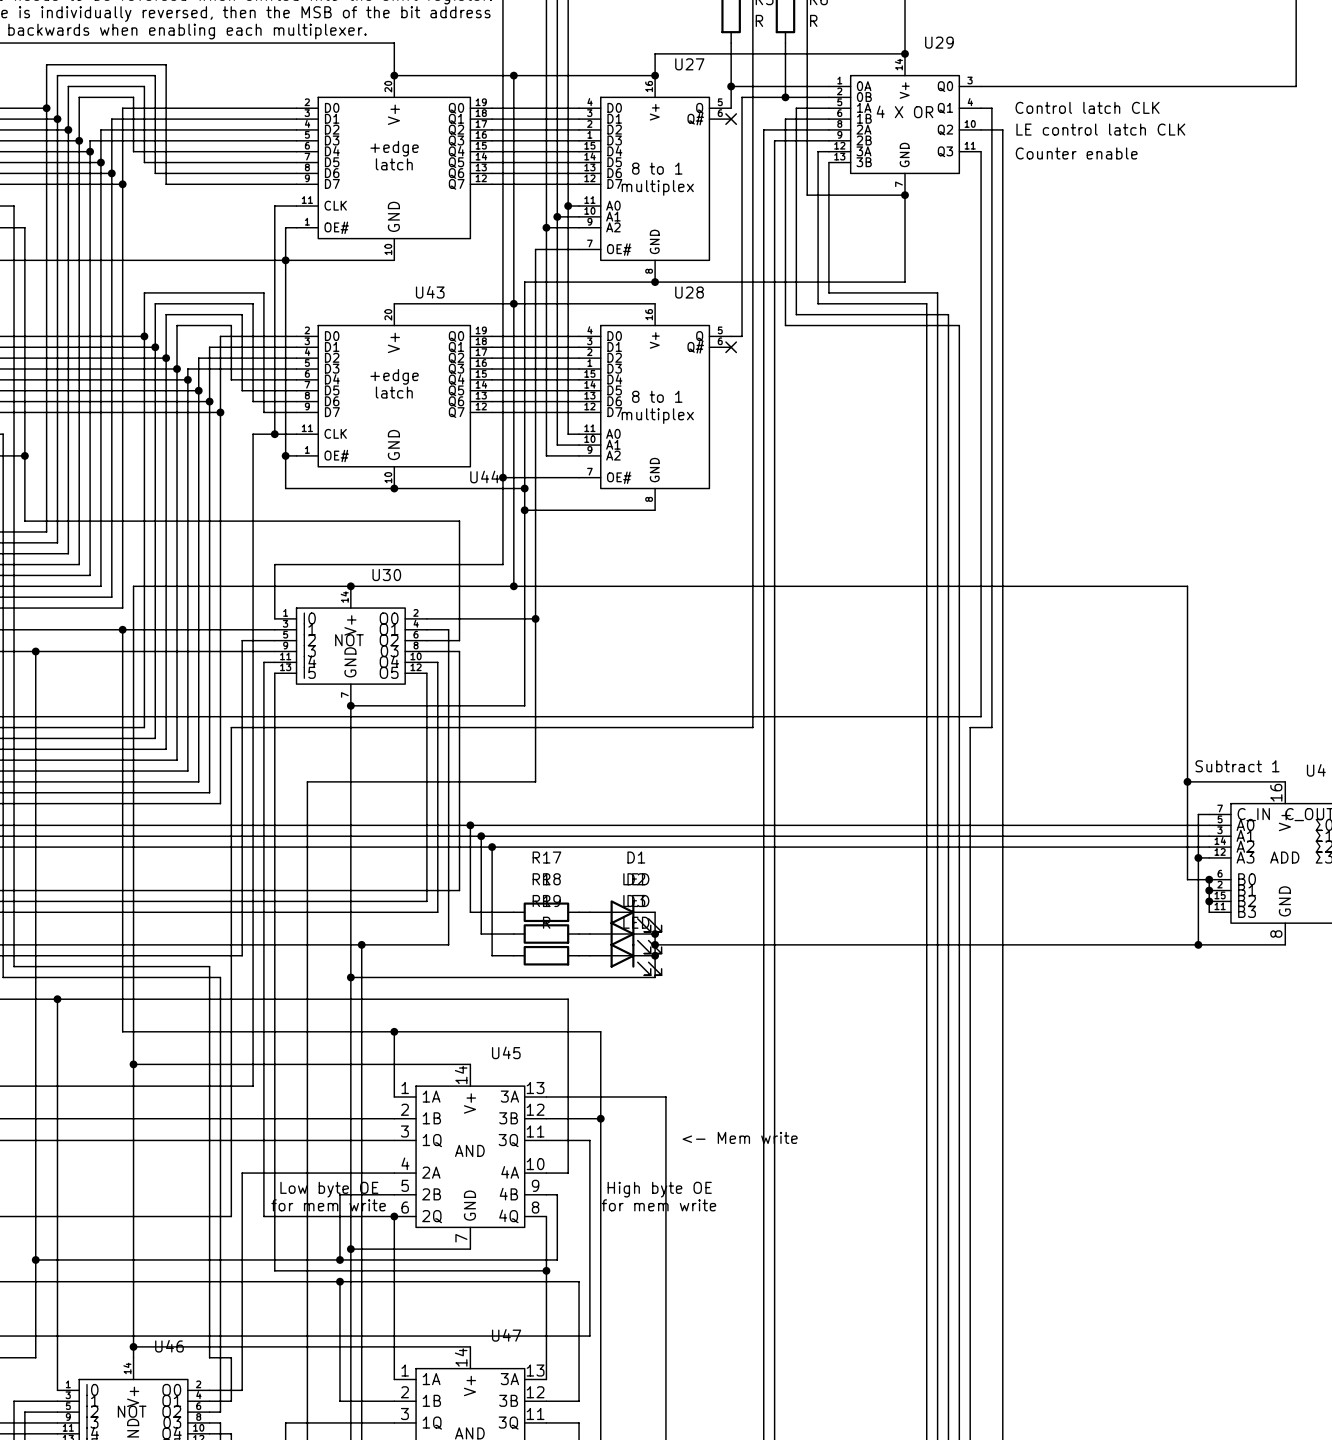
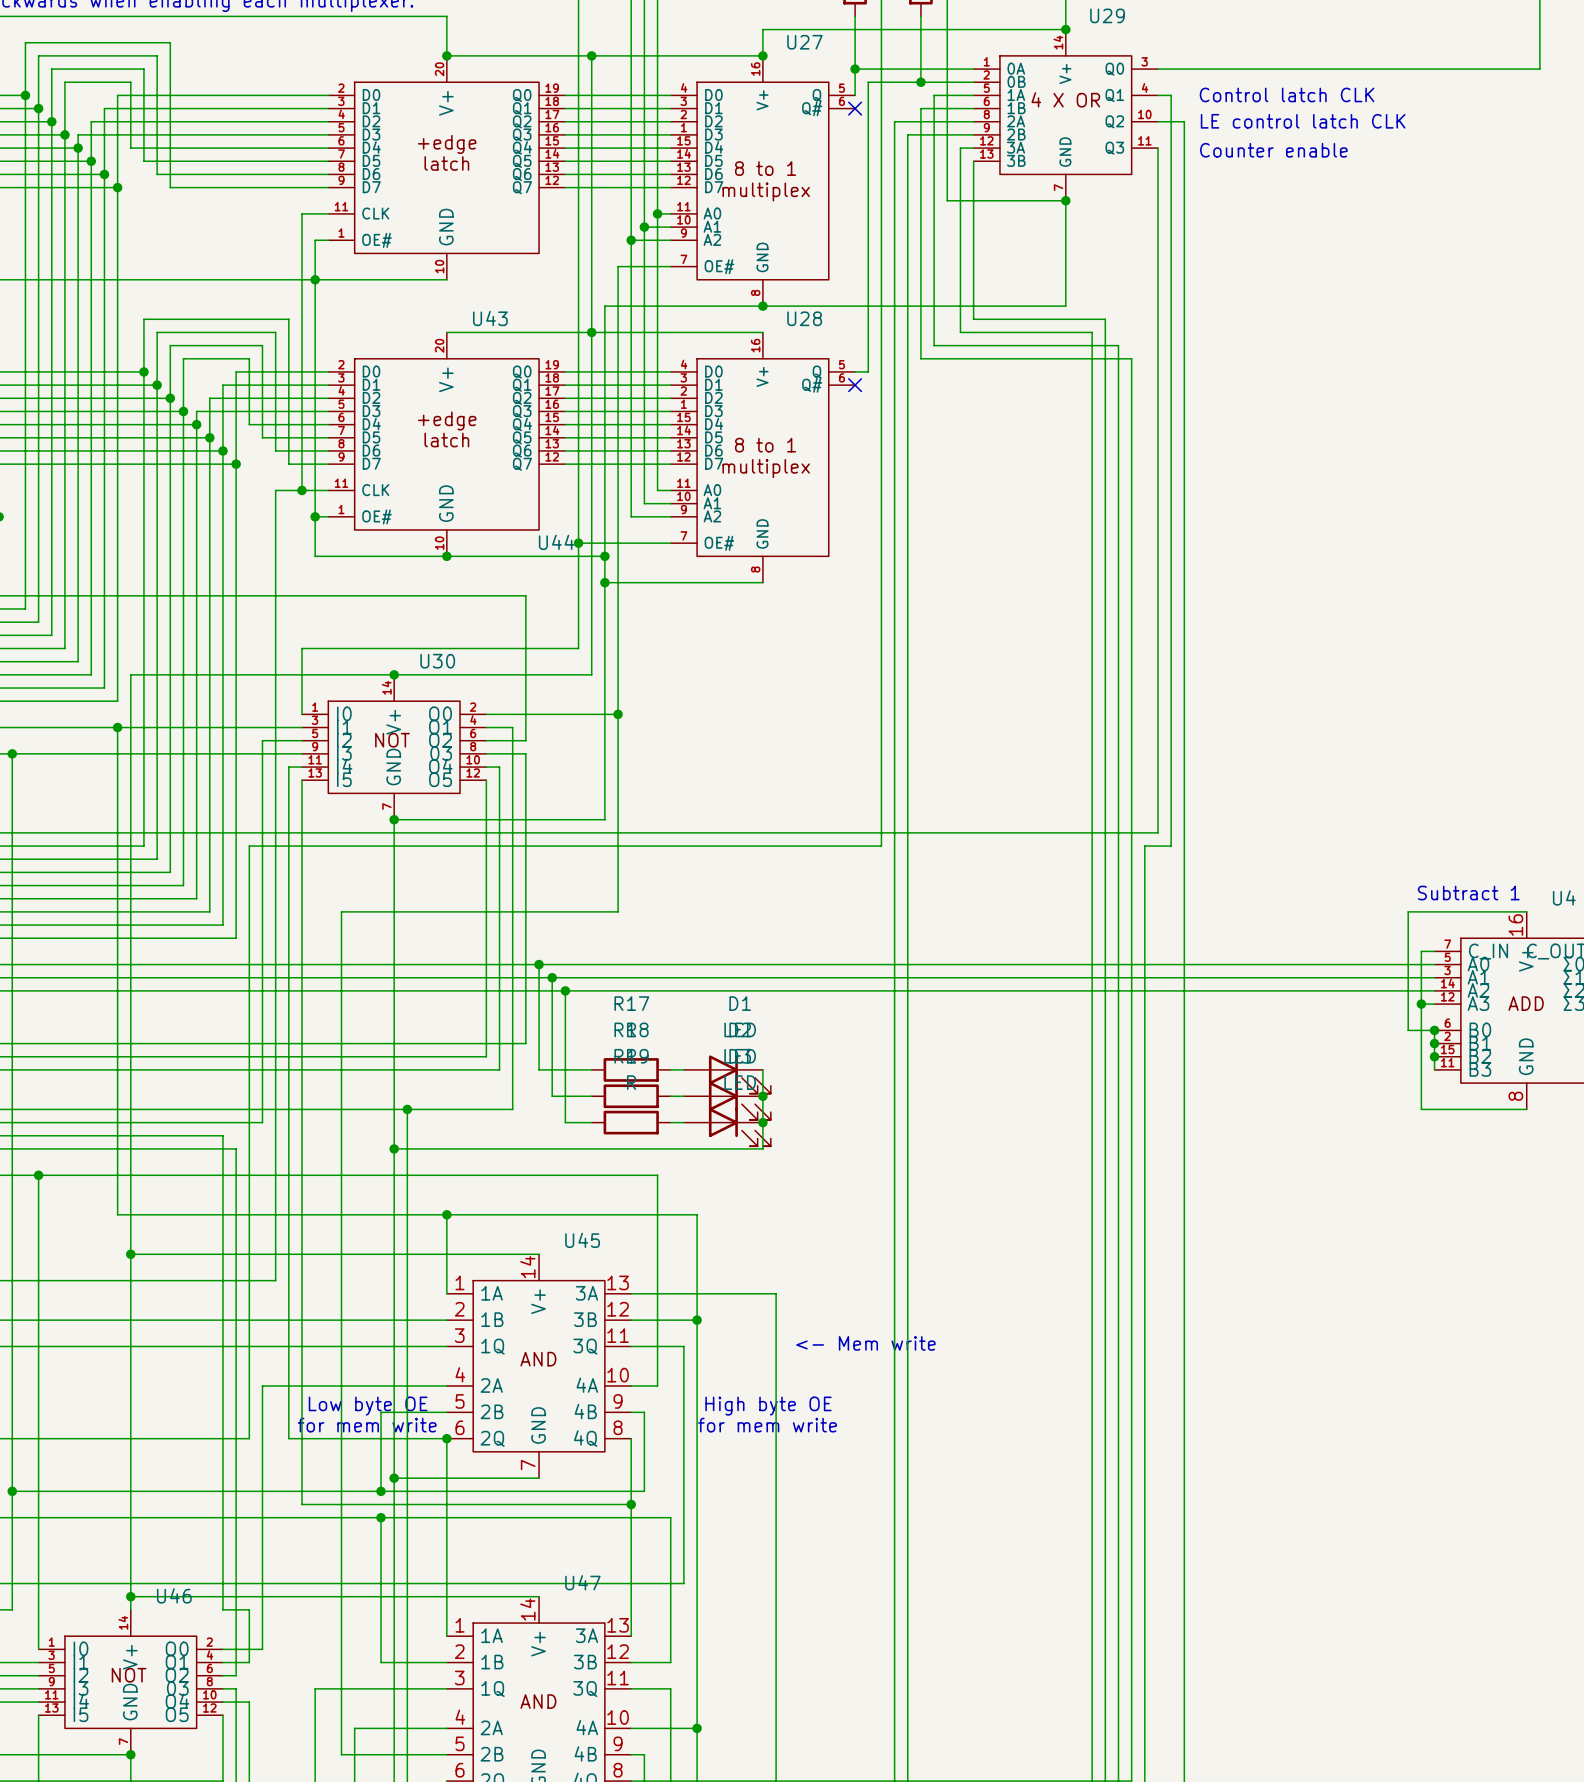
wire: (513, 586) (1187, 586) (1187, 781) -> none
junction: (513, 586) -> none
junction: (1187, 781) -> none
wire: (655, 944) (1198, 944) -> none
junction: (655, 944) -> none
junction: (1198, 944) -> none

